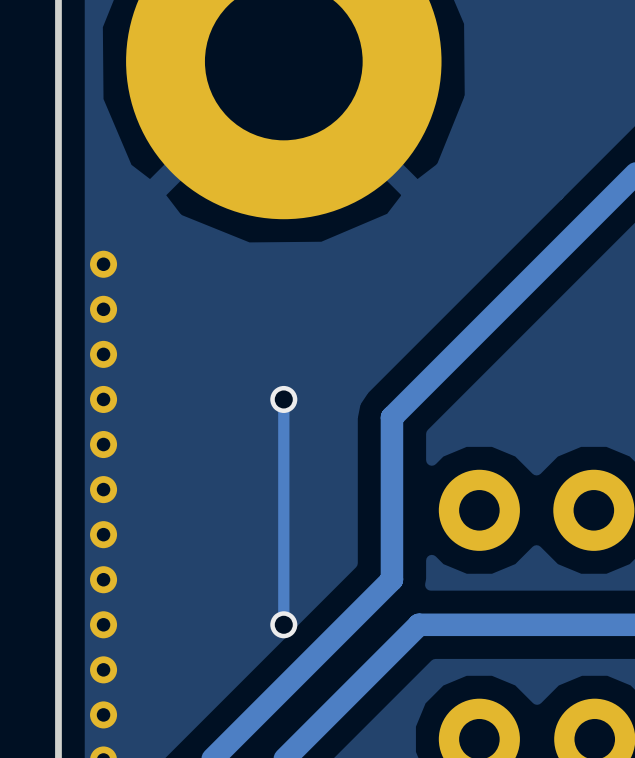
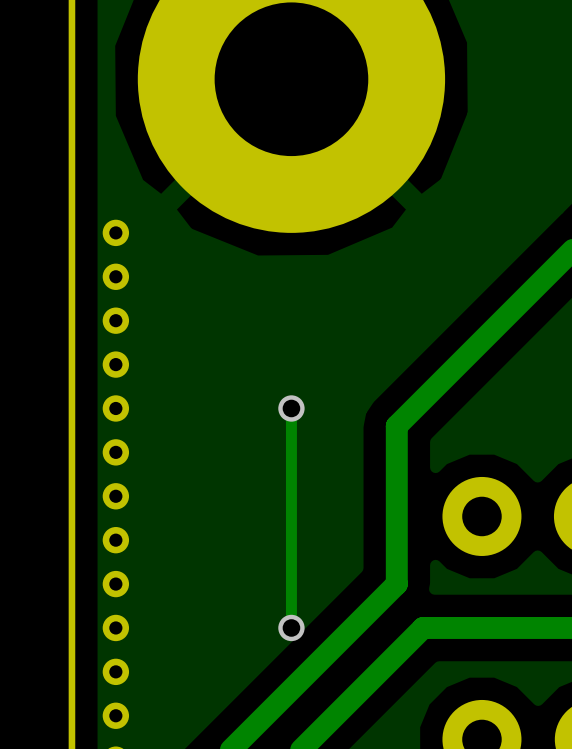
part: none -> (115, 232)

